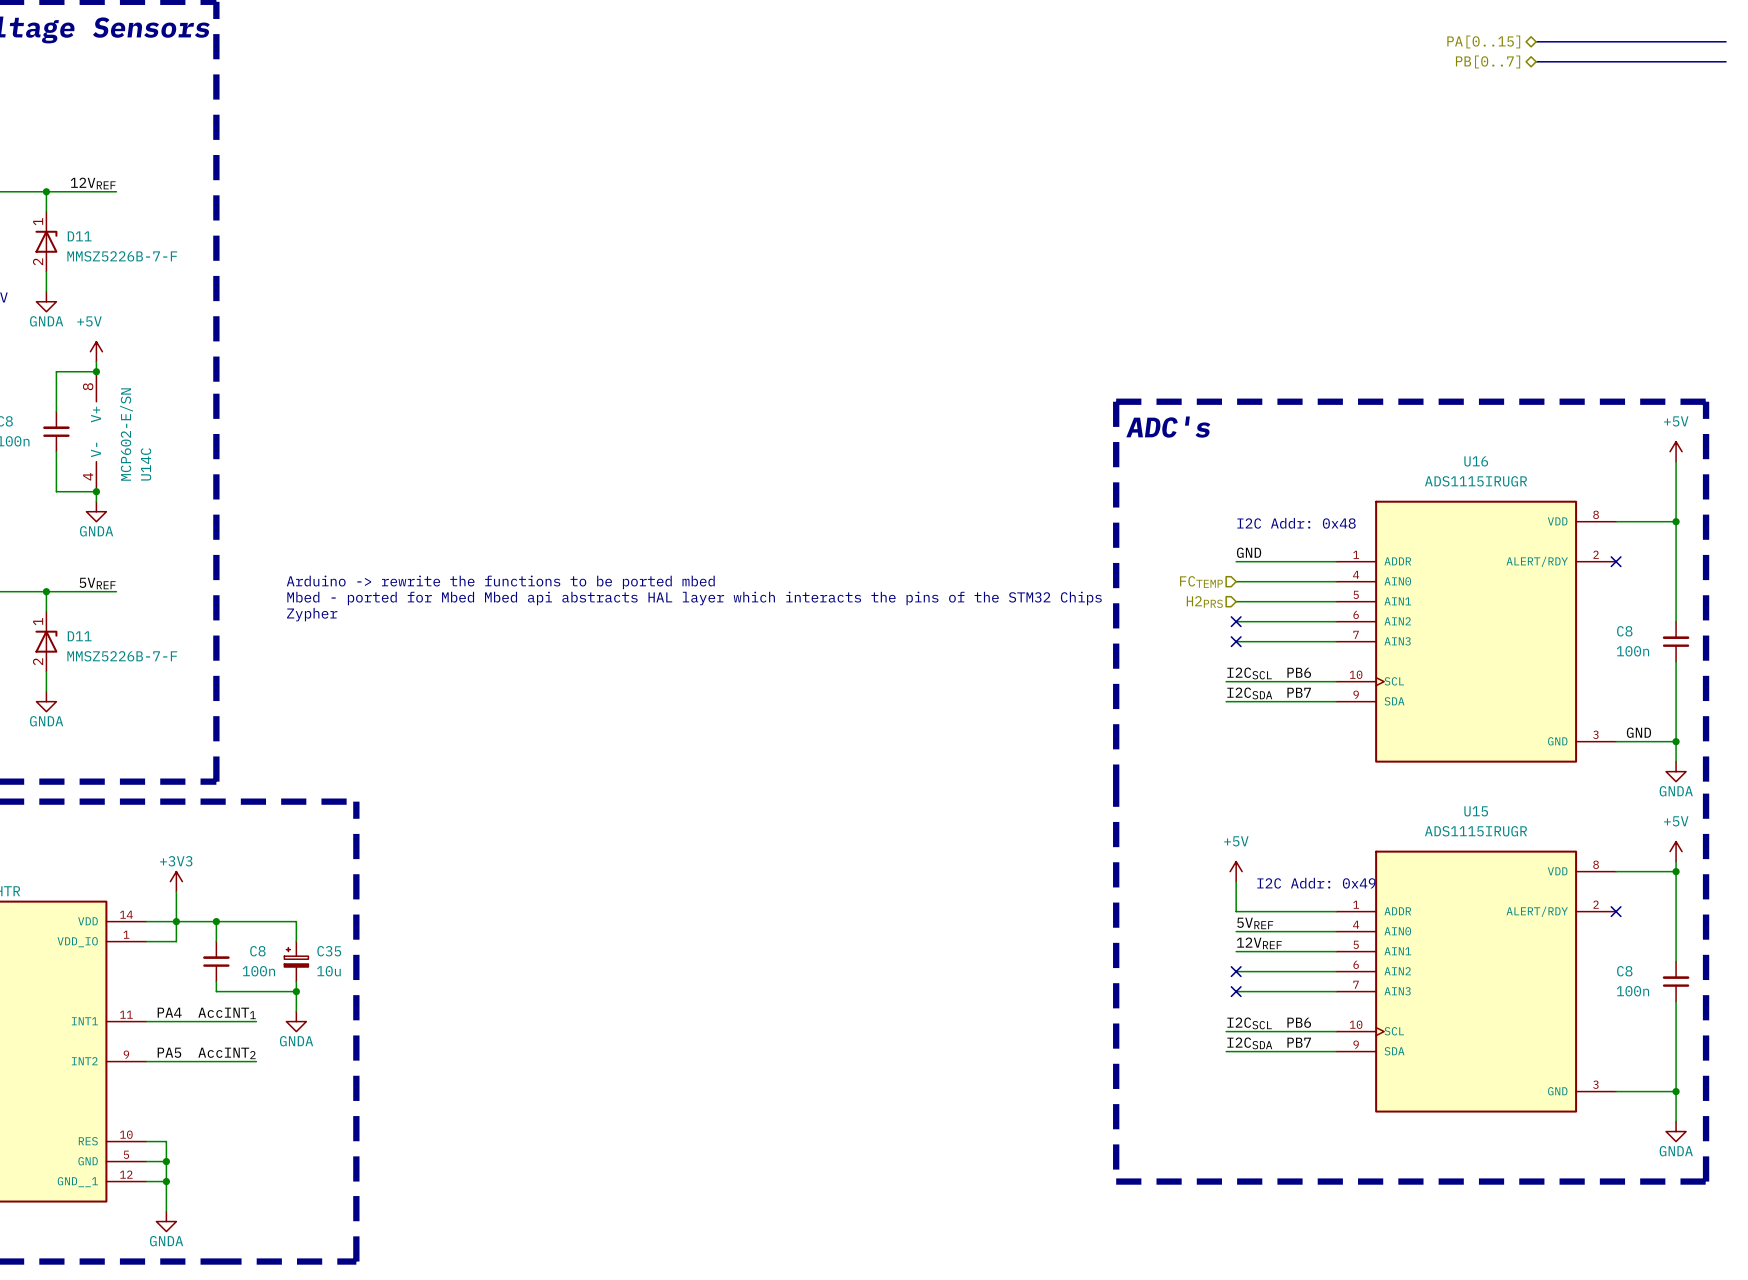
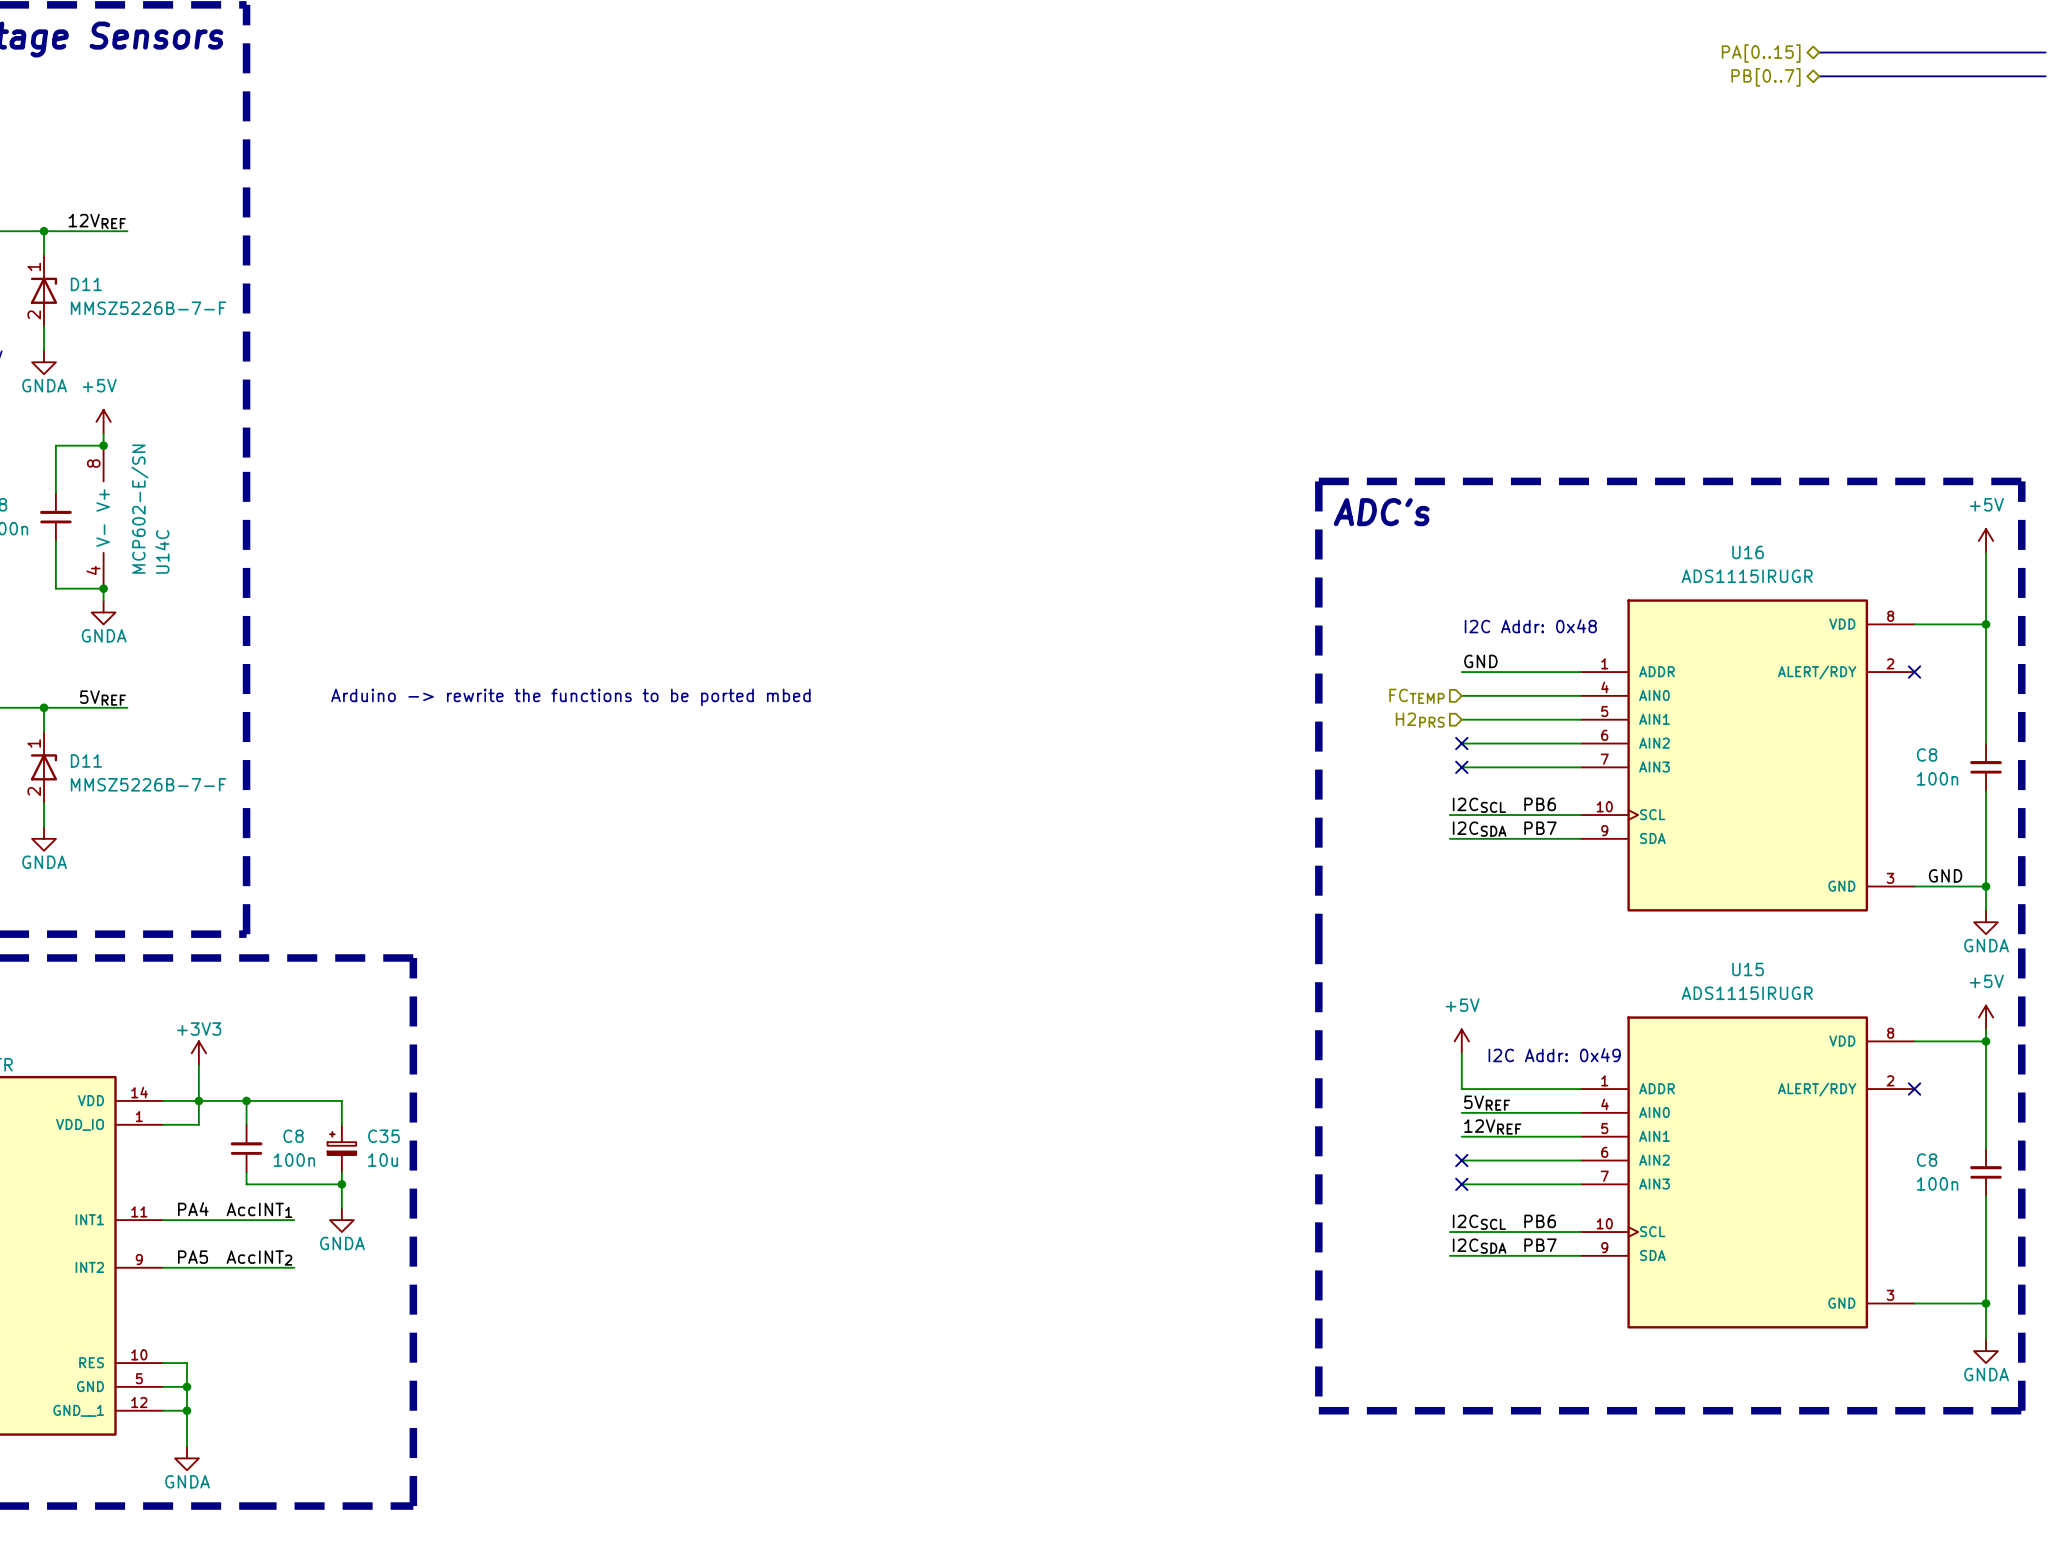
text: Mbed - ported for Mbed Mbed api abstracts HAL layer which interacts the pins of the STM32 Chips (694, 598) -> none
text: Zypher (312, 614) -> none

